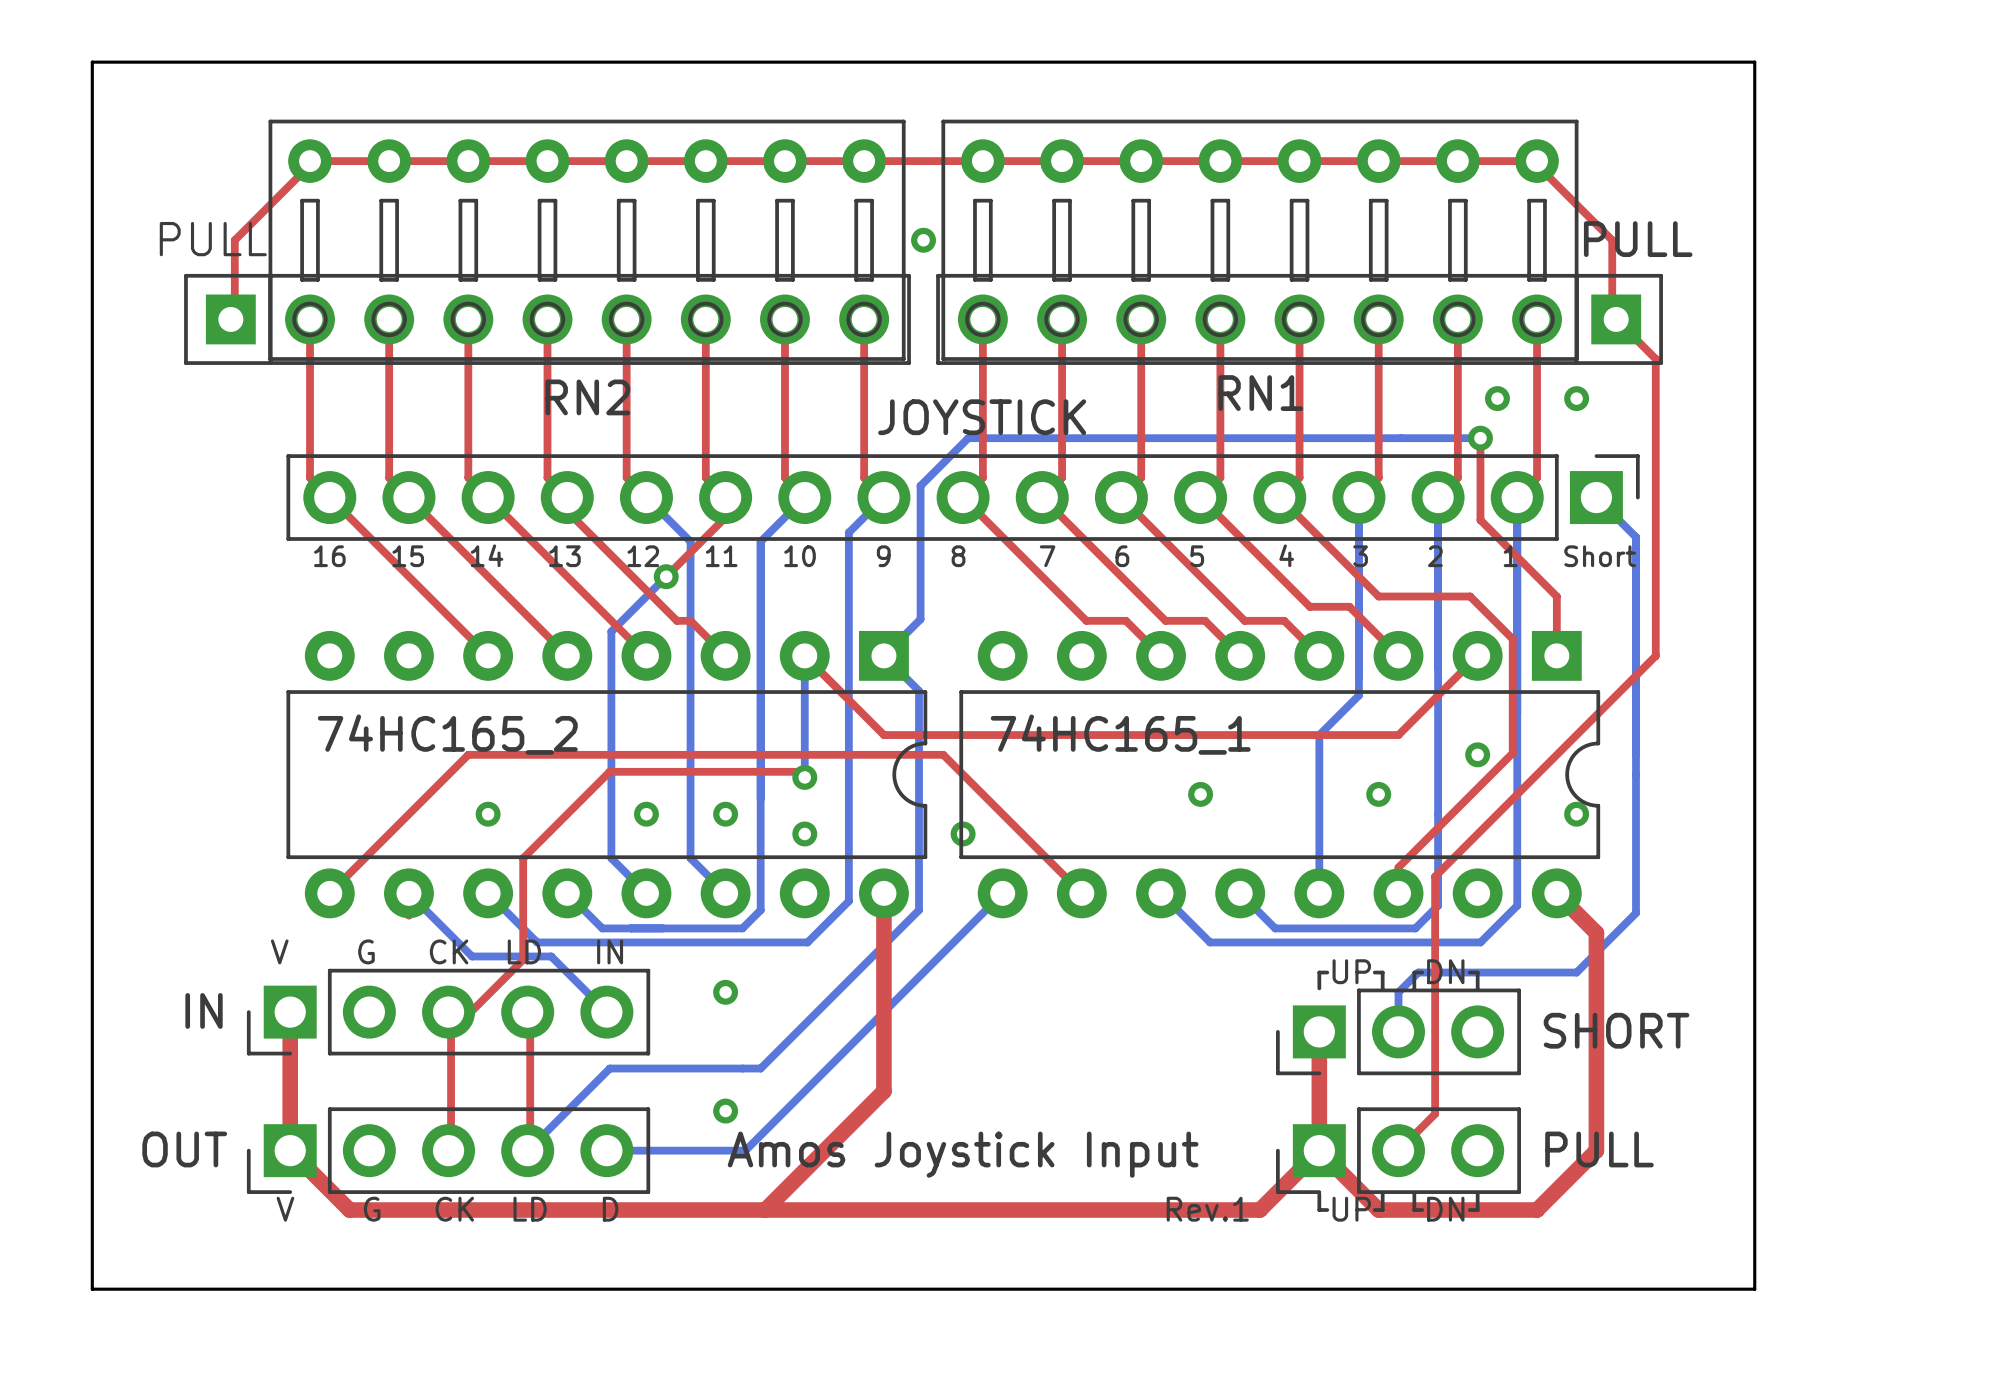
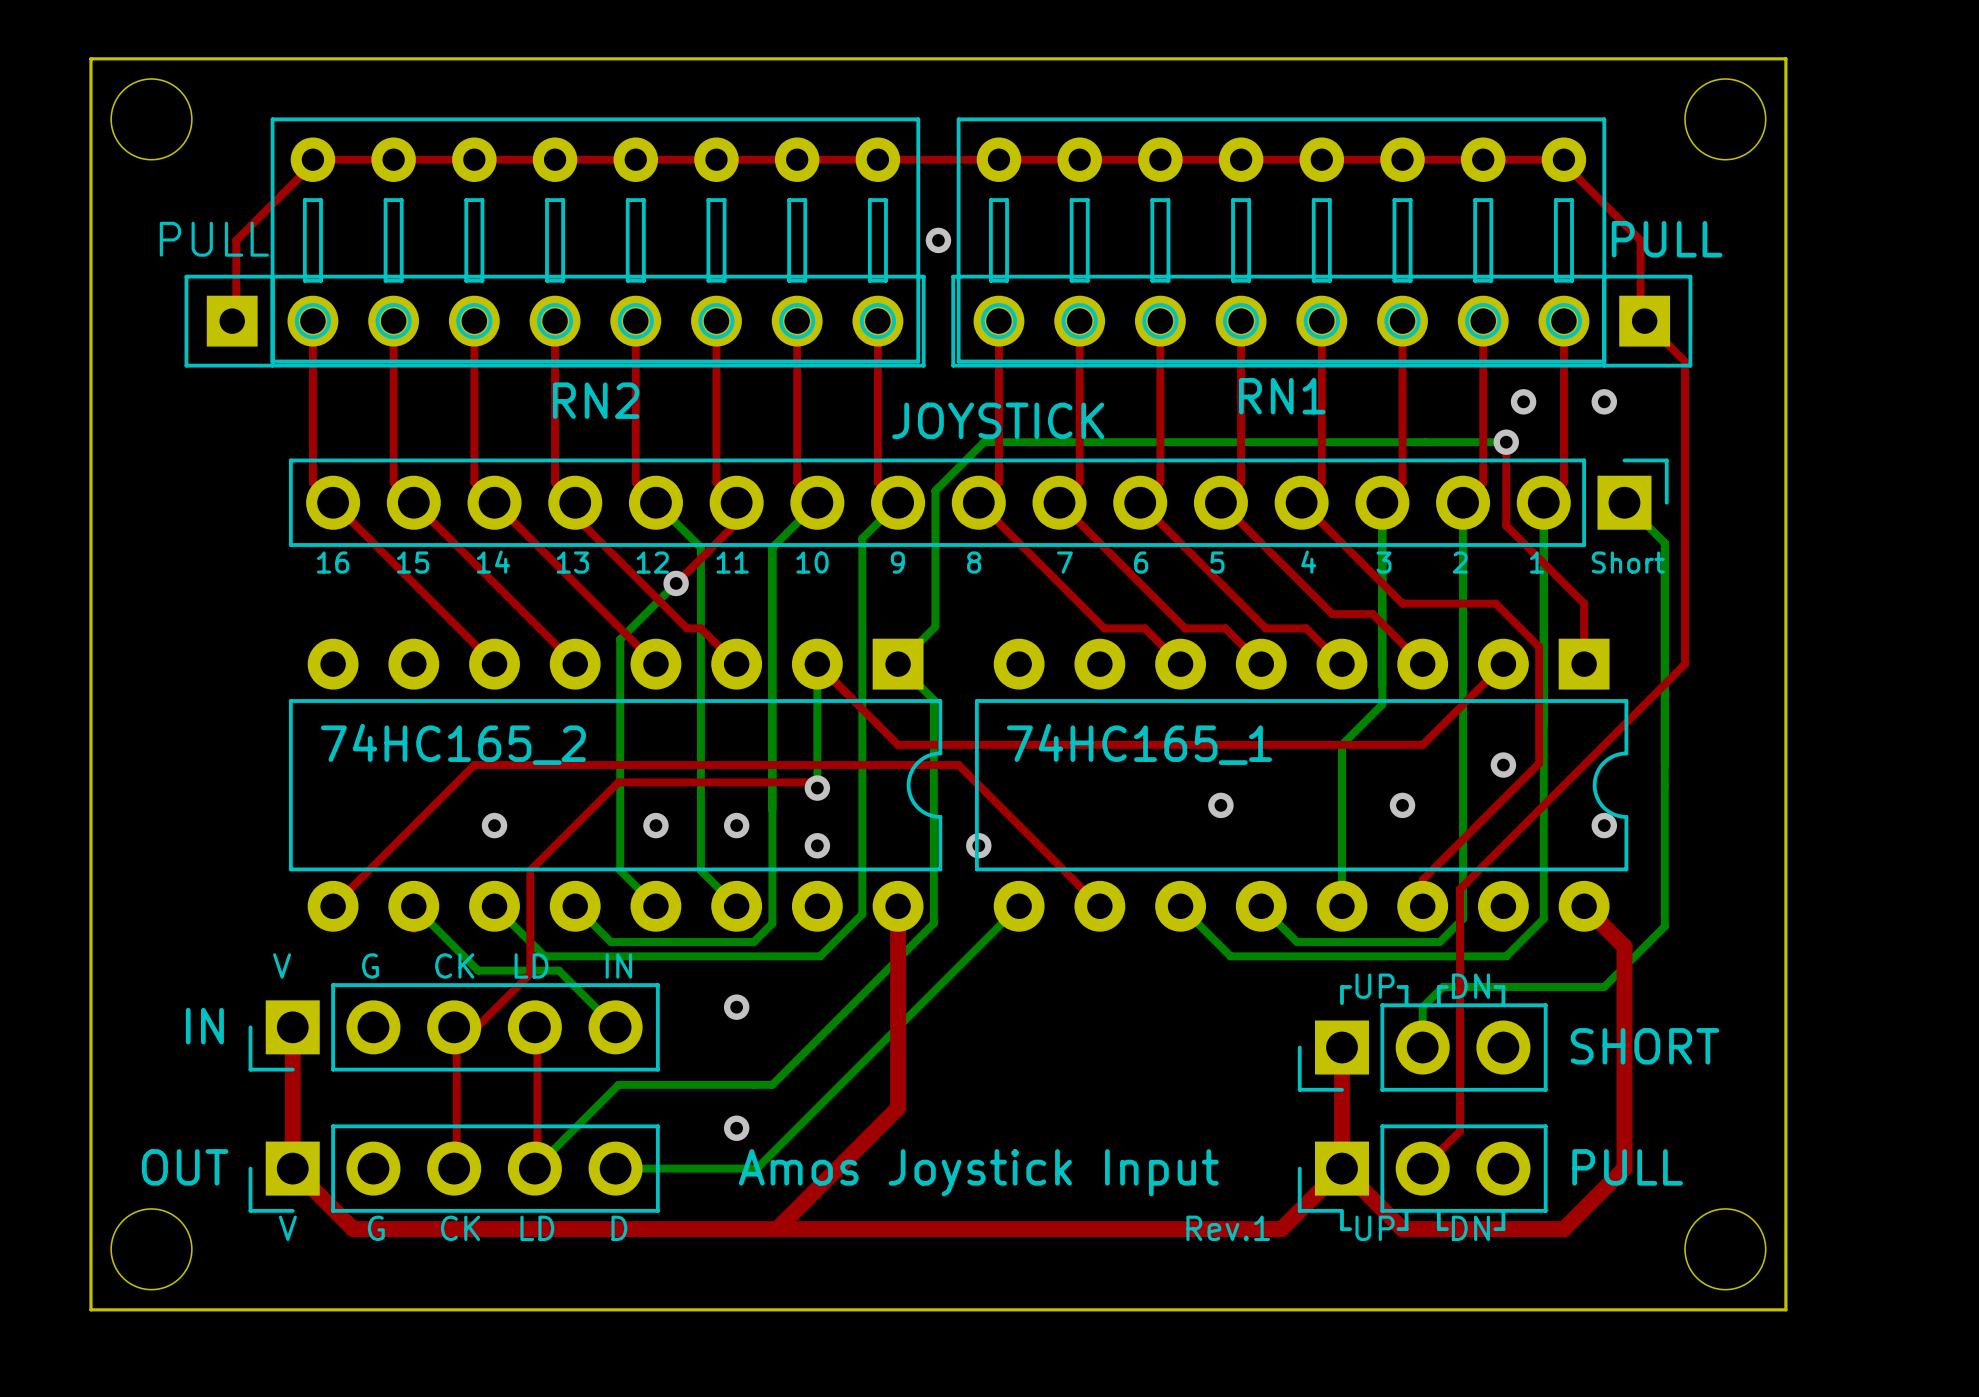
round board edge: none -> [110, 78, 193, 161]
round board edge: none -> [1684, 78, 1767, 161]
round board edge: none -> [110, 1208, 193, 1291]
round board edge: none -> [1684, 1208, 1767, 1291]

